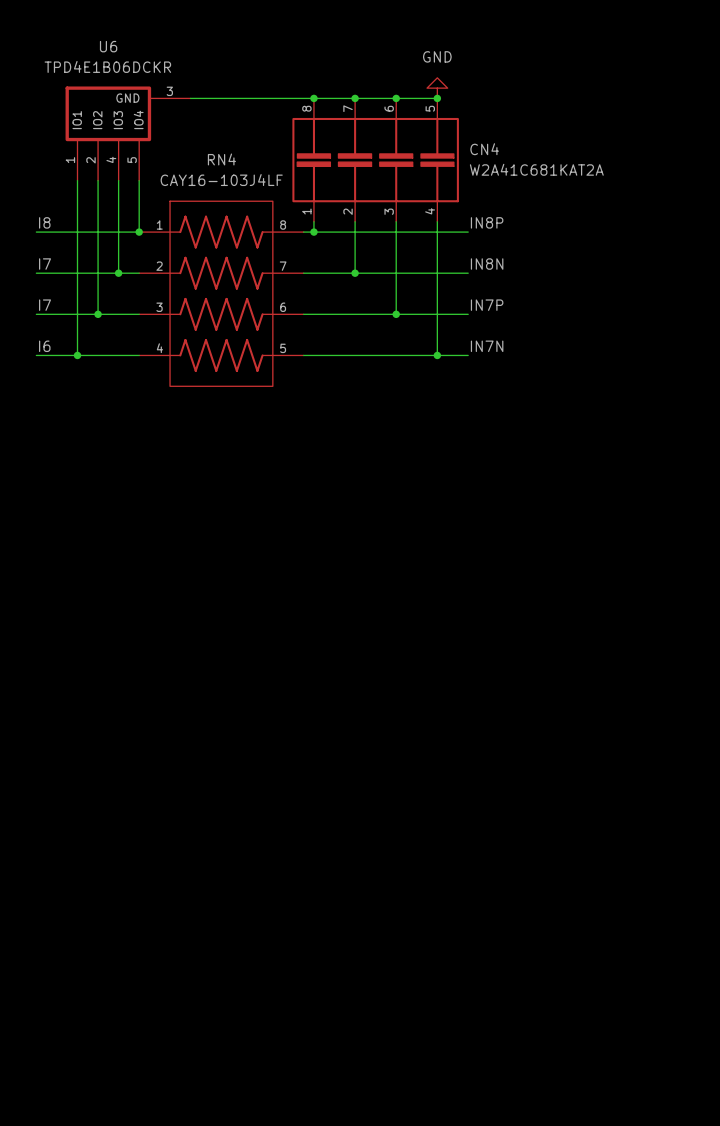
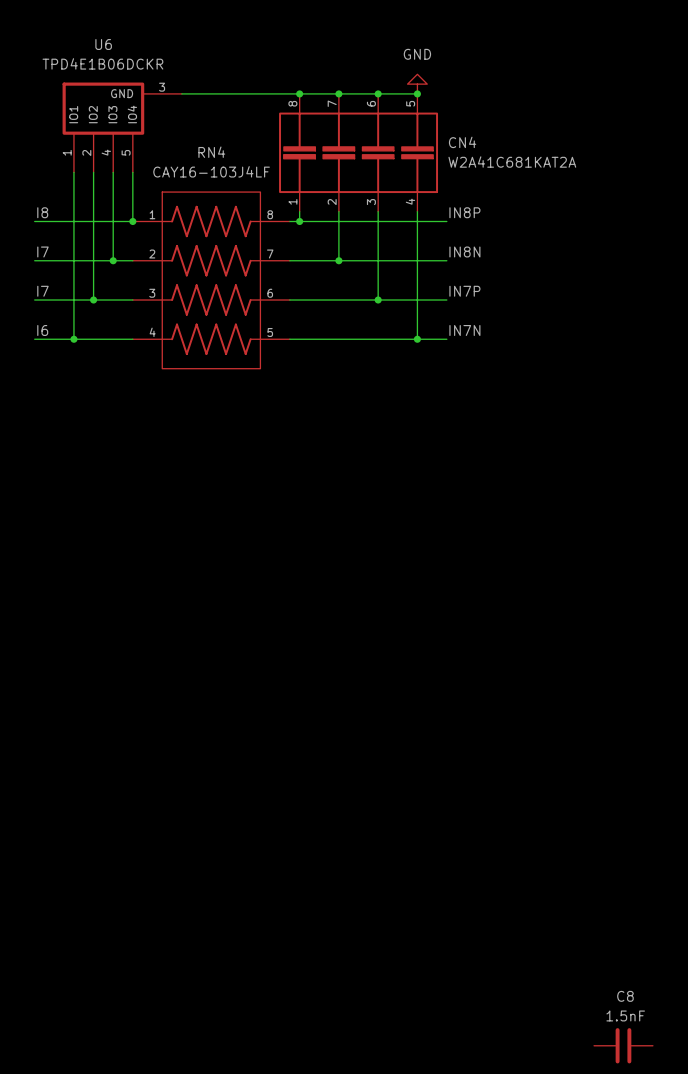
C8: none -> 1.5nF (623, 1045)

